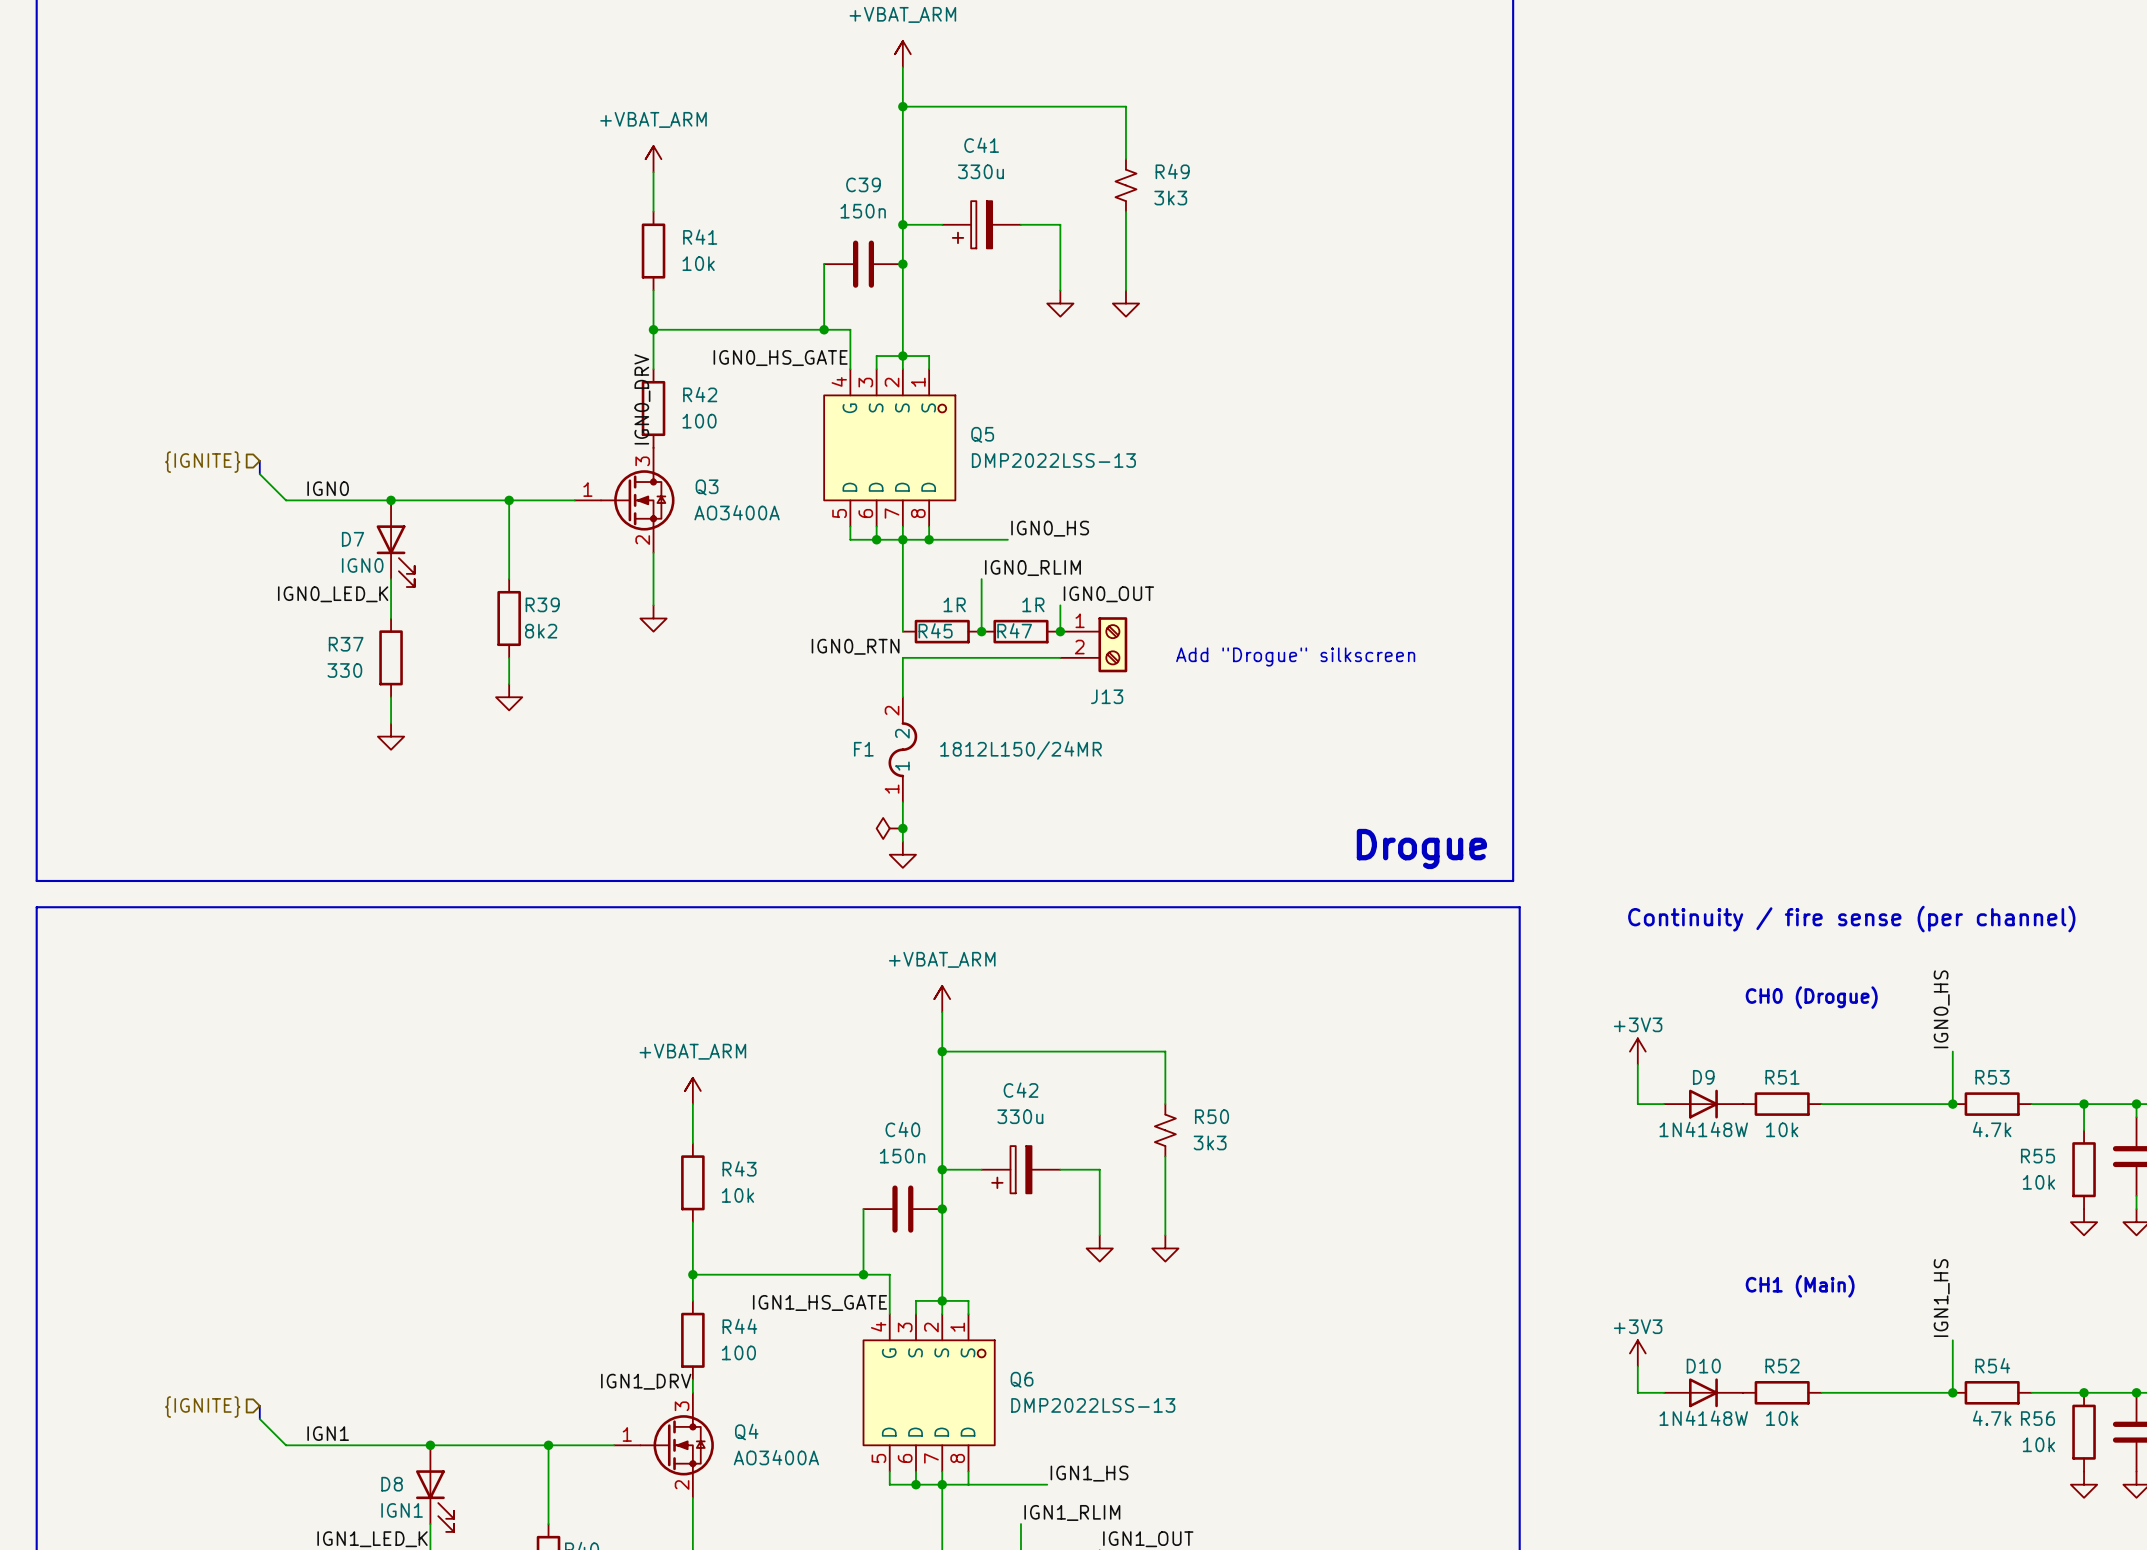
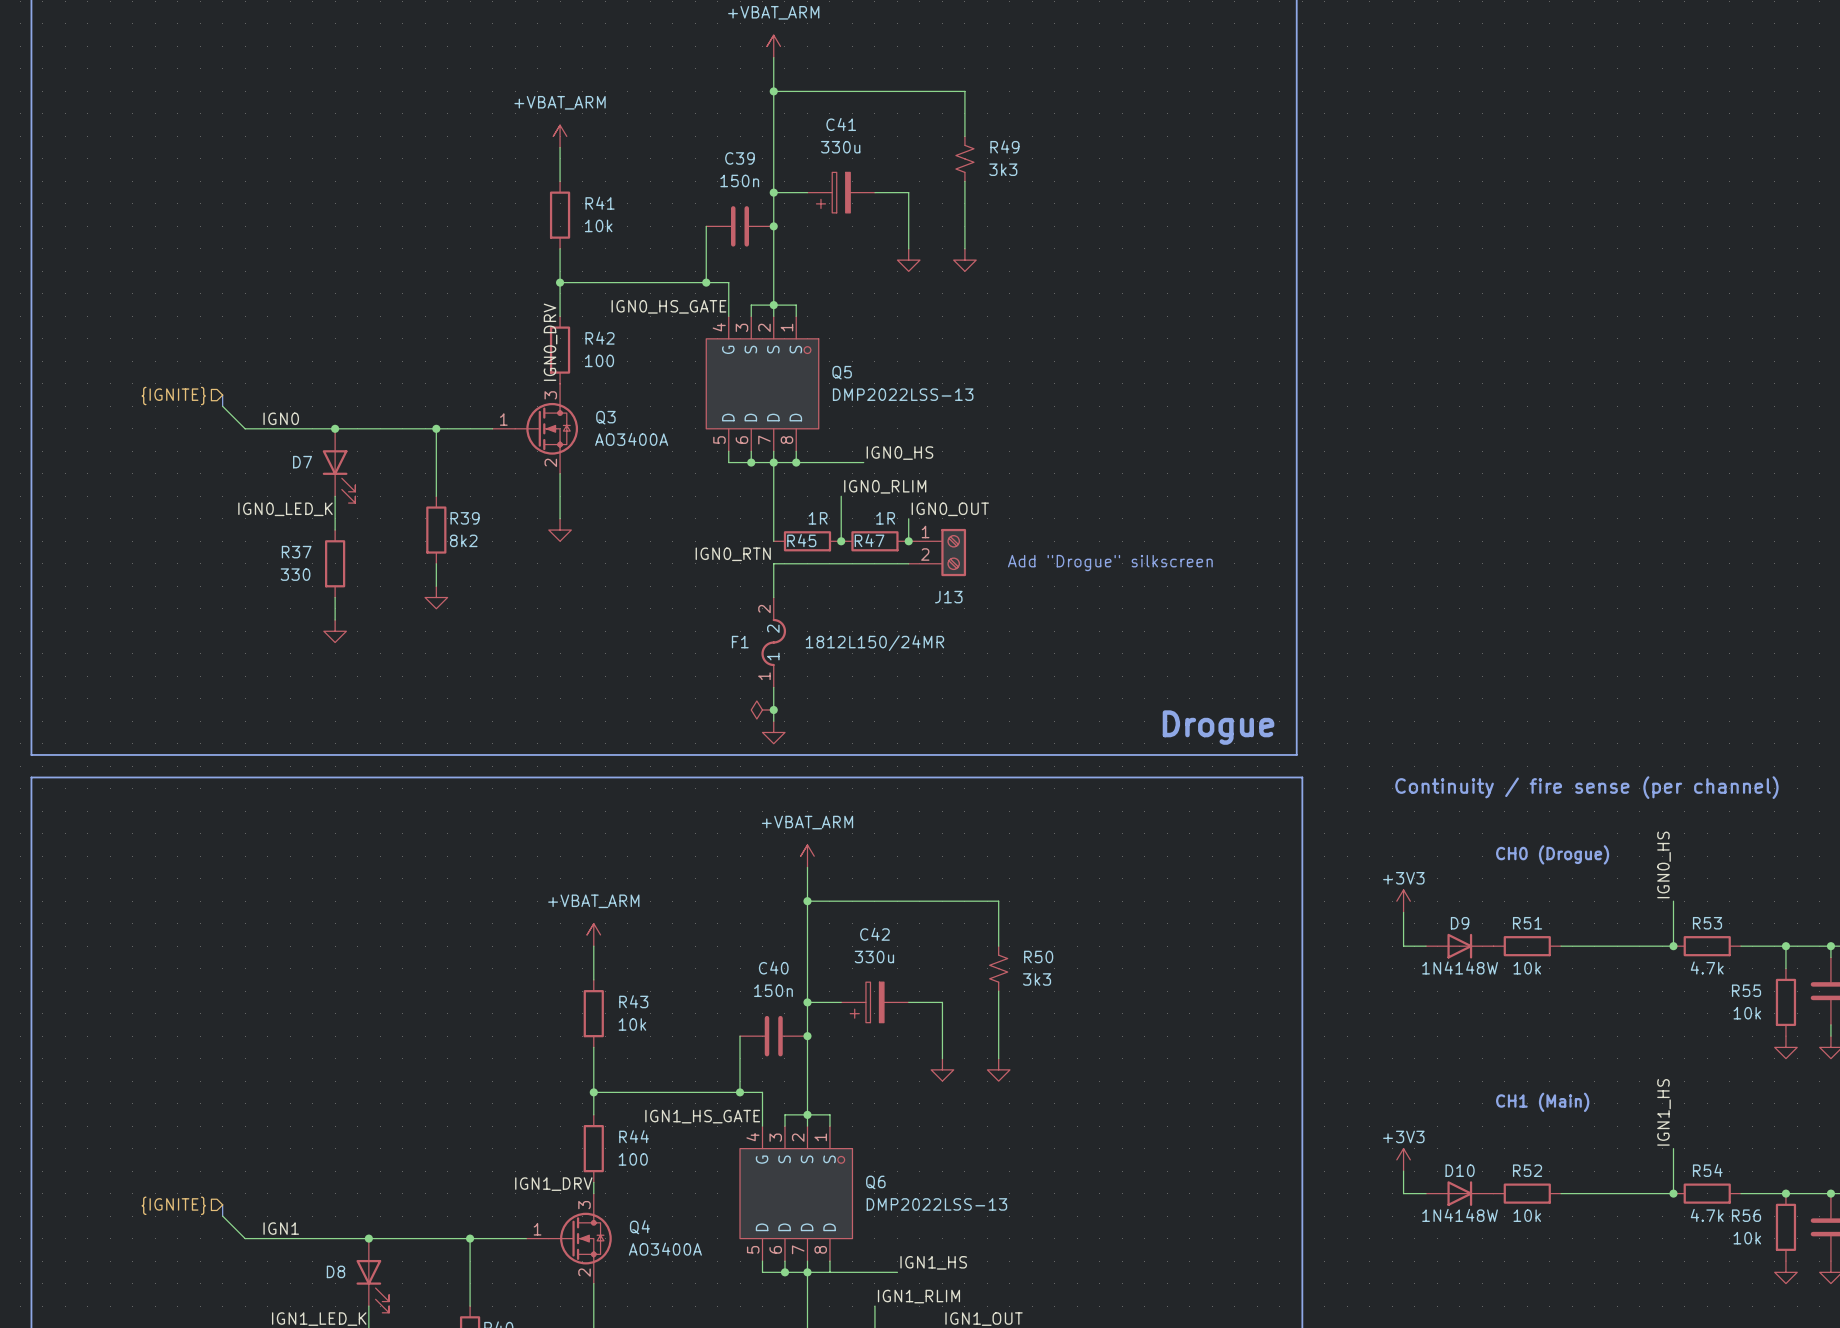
D7 value: IGN0 (362, 565) -> none
D8 value: IGN1 (402, 1510) -> none

